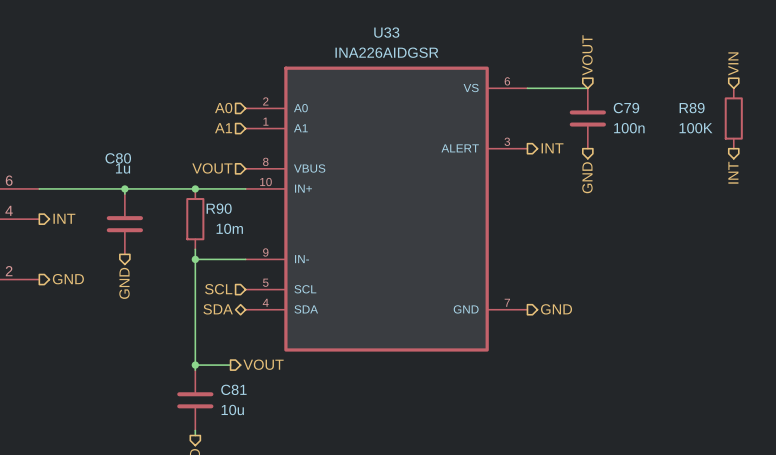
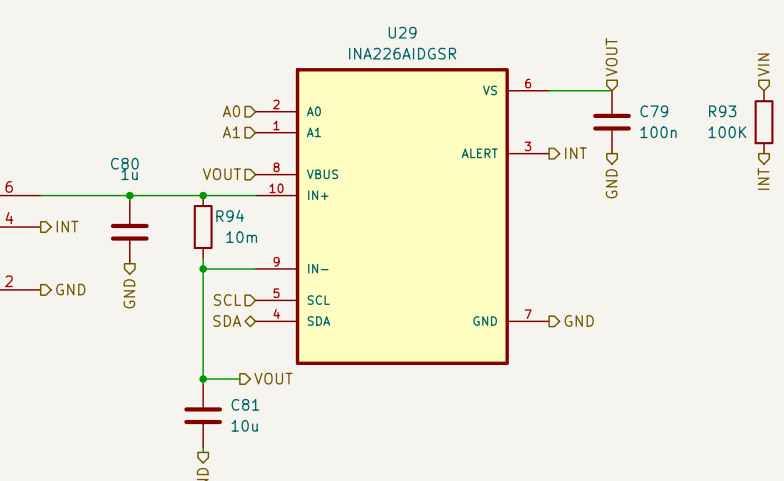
U33 name: U33 (386, 32) -> U29 (402, 32)
R89 name: R89 (692, 108) -> R93 (722, 111)
R90 name: R90 (219, 208) -> R94 (230, 215)

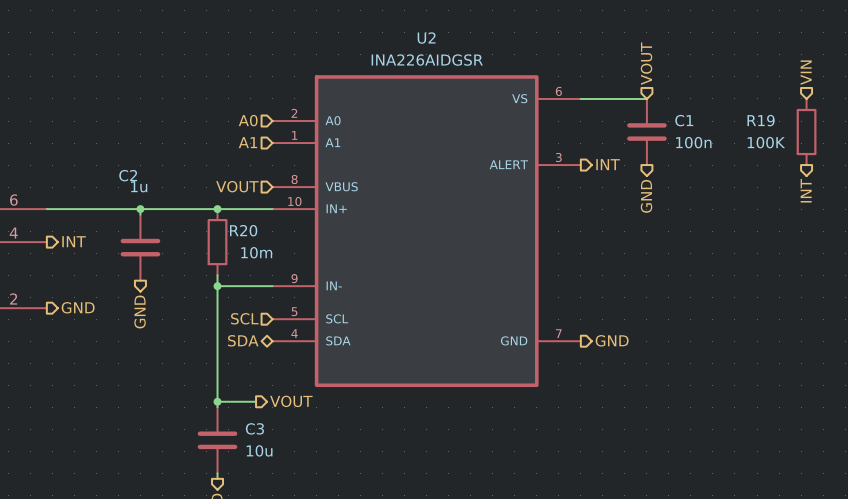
U29 name: U29 (402, 32) -> U2 (426, 38)
C79 name: C79 (654, 111) -> C1 (684, 120)
R93 name: R93 (722, 111) -> R19 (761, 120)
C80 name: C80 (124, 163) -> C2 (128, 175)
R94 name: R94 (230, 215) -> R20 (243, 230)
C81 name: C81 (245, 404) -> C3 (254, 428)

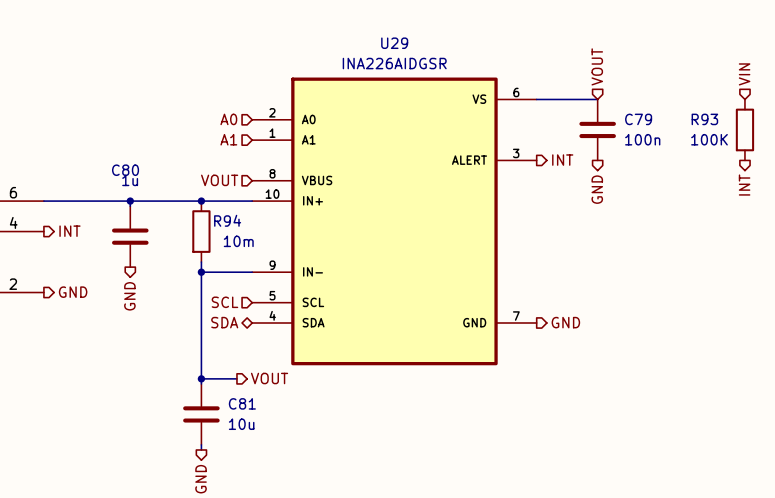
U2 name: U2 (426, 38) -> U29 (394, 43)
C1 name: C1 (684, 120) -> C79 (638, 119)
R19 name: R19 (761, 120) -> R93 (704, 119)
C2 name: C2 (128, 175) -> C80 (125, 170)
R20 name: R20 (243, 230) -> R94 (227, 220)
C3 name: C3 (254, 428) -> C81 (242, 403)

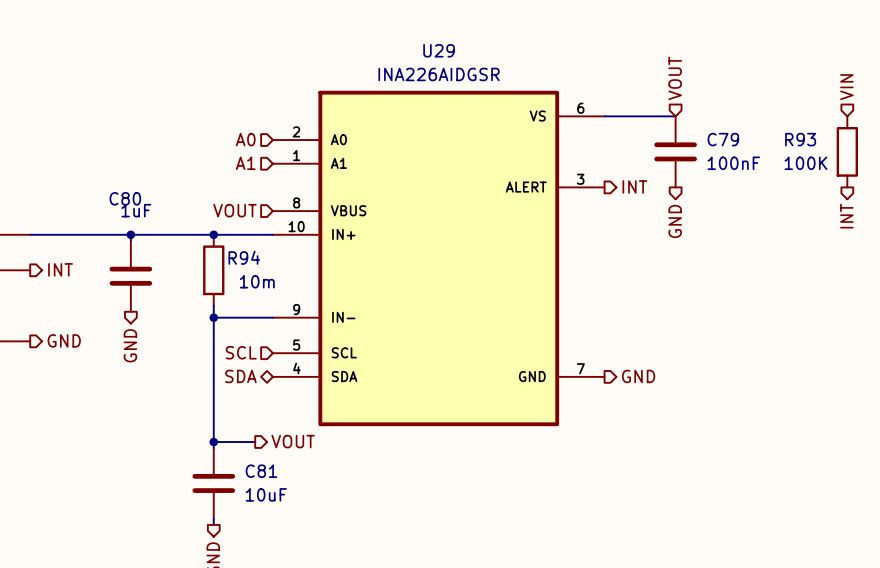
C79 value: 100n (642, 139) -> 100nF (733, 163)
C80 value: 1u (130, 180) -> 1uF (136, 210)
C81 value: 10u (241, 424) -> 10uF (266, 494)

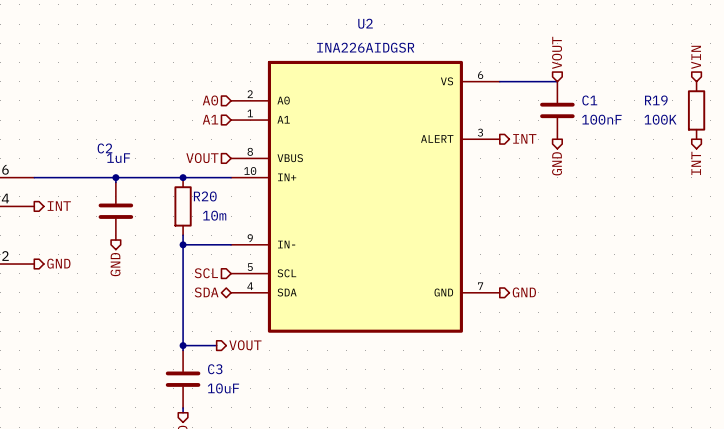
U29 name: U29 (439, 50) -> U2 (365, 23)
C79 name: C79 (723, 139) -> C1 (589, 100)
R93 name: R93 (800, 139) -> R19 (656, 100)
C80 name: C80 (125, 198) -> C2 (104, 148)
R94 name: R94 (244, 257) -> R20 (205, 196)
C81 name: C81 (261, 471) -> C3 (215, 369)

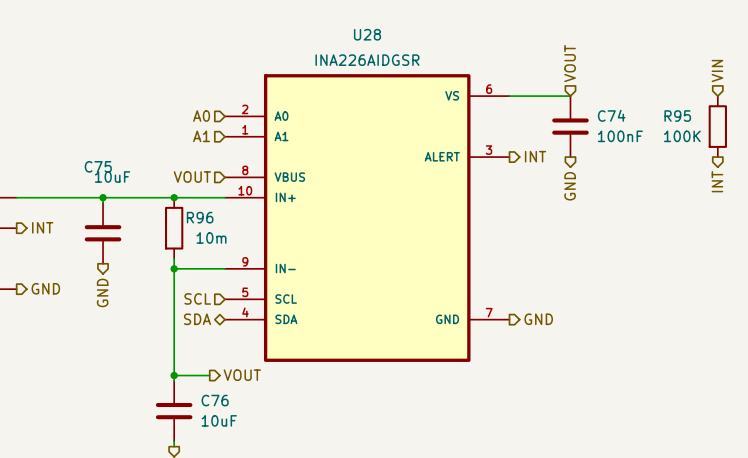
U2 name: U2 (365, 23) -> U28 (367, 34)
C1 name: C1 (589, 100) -> C74 (611, 115)
R19 name: R19 (656, 100) -> R95 (677, 116)
C2 name: C2 (104, 148) -> C75 (98, 166)
C2 value: 1uF (118, 158) -> 10uF (112, 177)
R20 name: R20 (205, 196) -> R96 (200, 217)
C3 name: C3 (215, 369) -> C76 (215, 400)

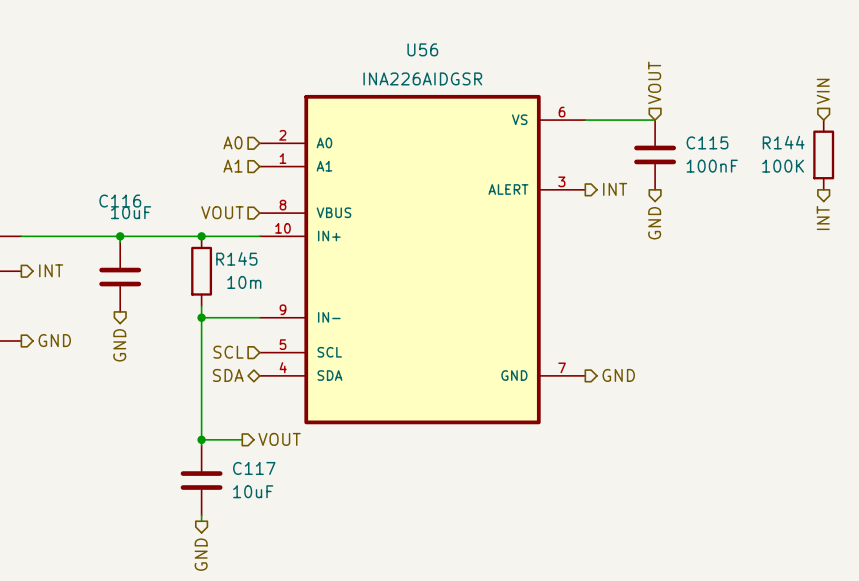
U28 name: U28 (367, 34) -> U56 (422, 49)
C74 name: C74 (611, 115) -> C115 (707, 142)
R95 name: R95 (677, 116) -> R144 (783, 142)
C75 name: C75 (98, 166) -> C116 (120, 201)
R96 name: R96 (200, 217) -> R145 (236, 258)
C76 name: C76 (215, 400) -> C117 (254, 468)

